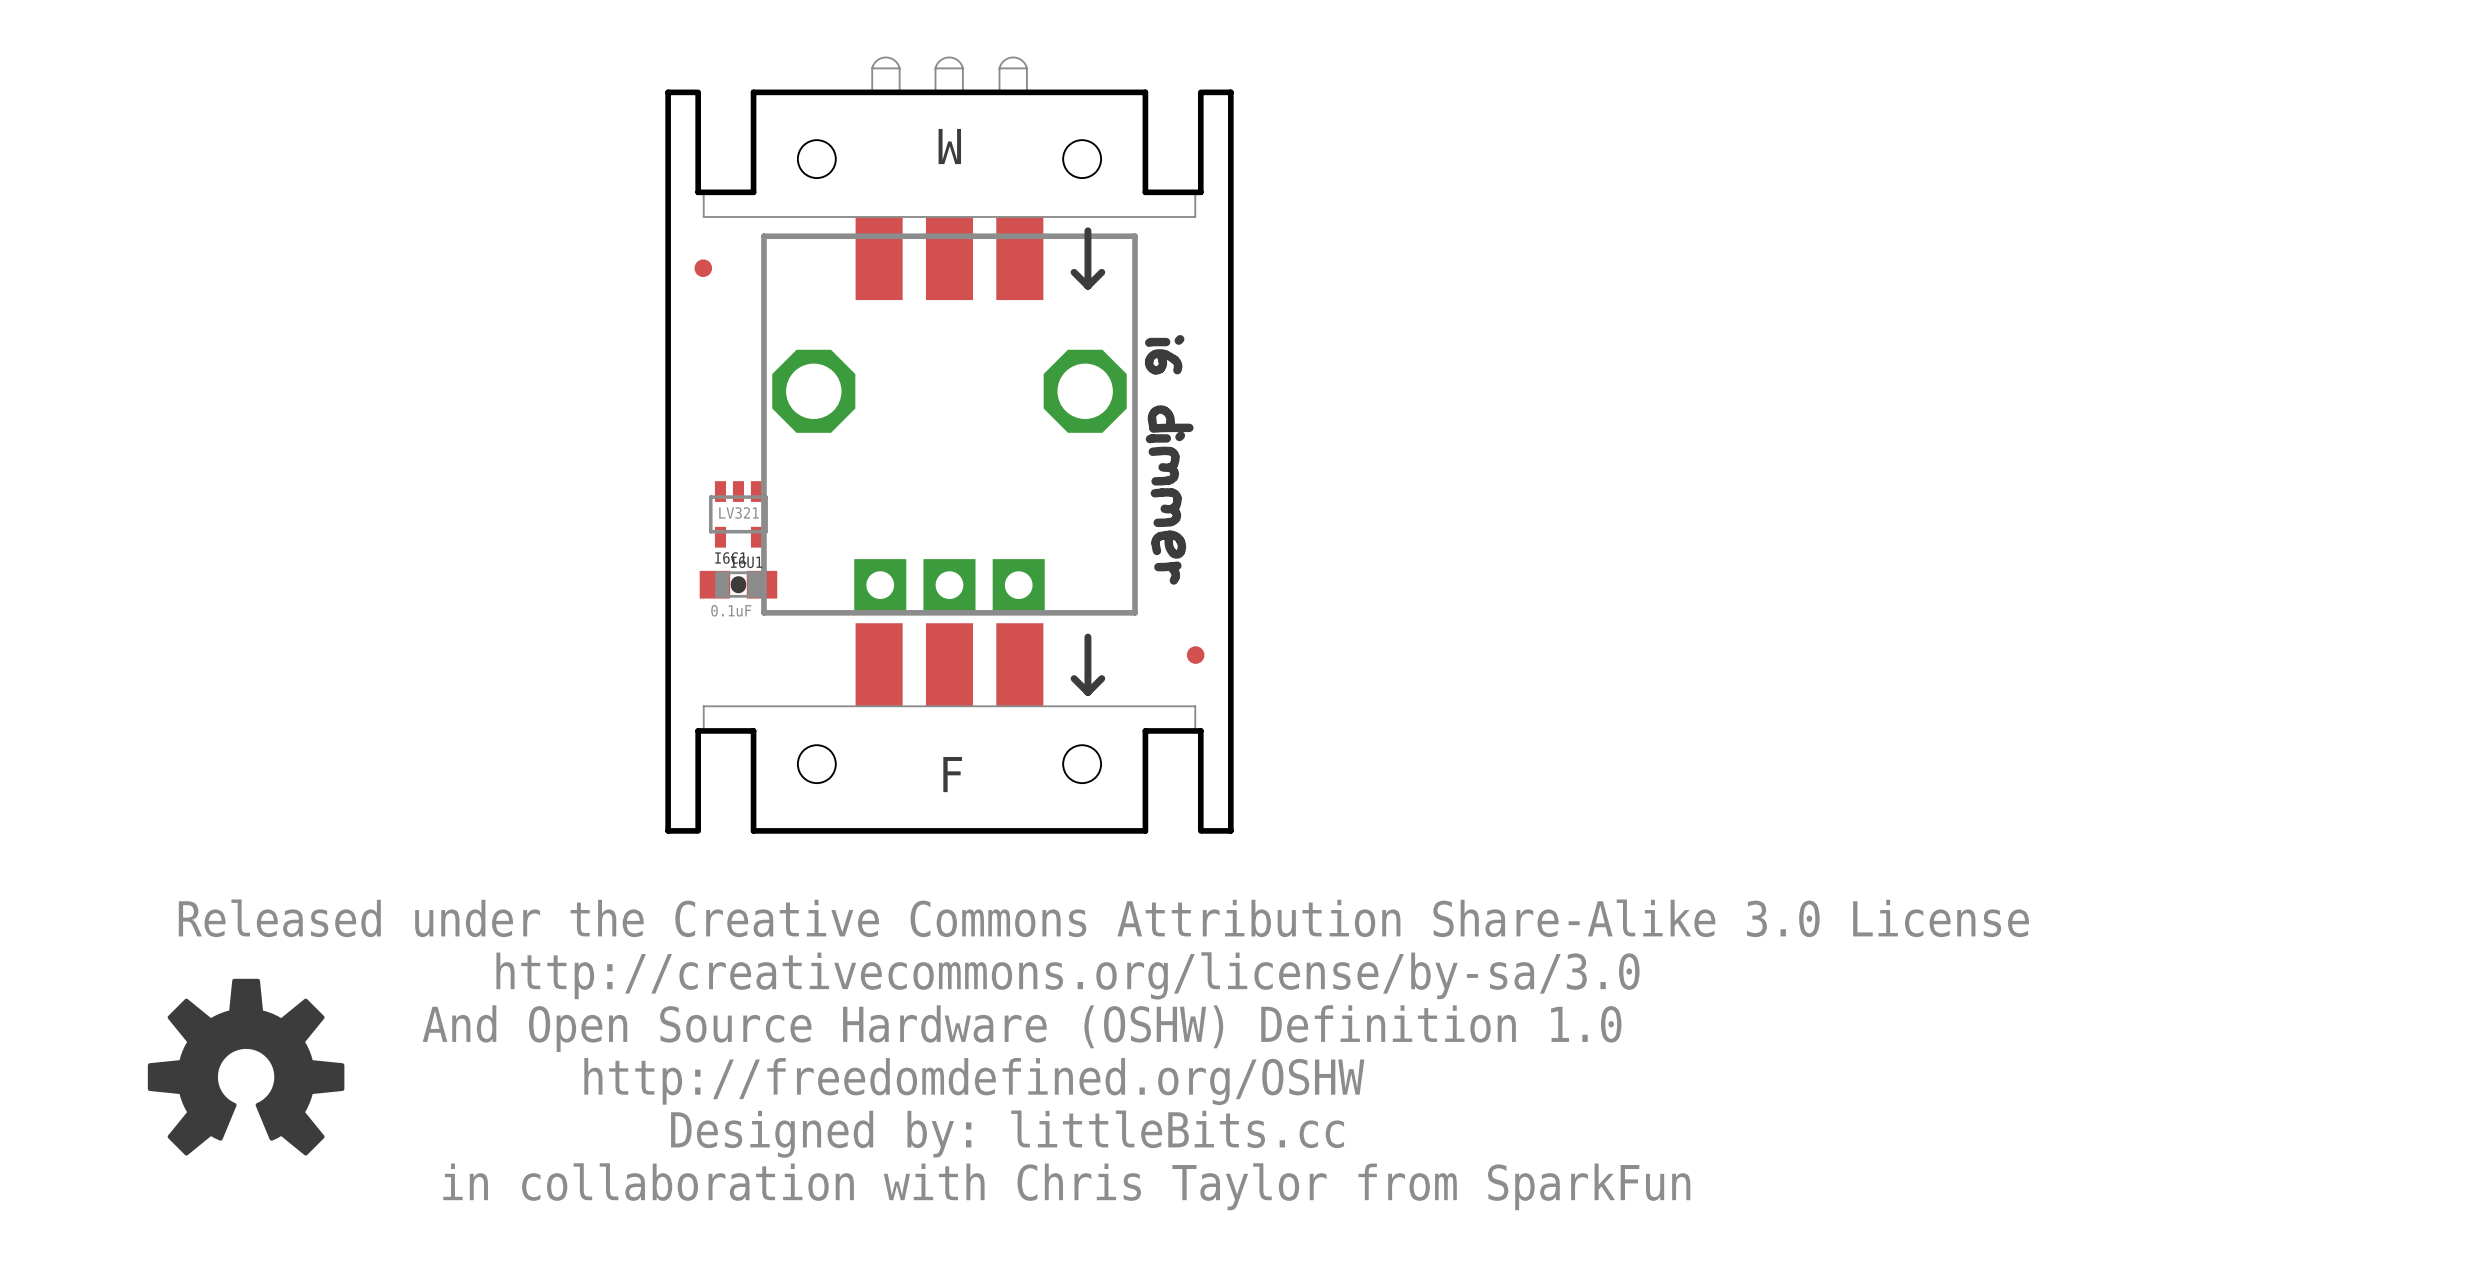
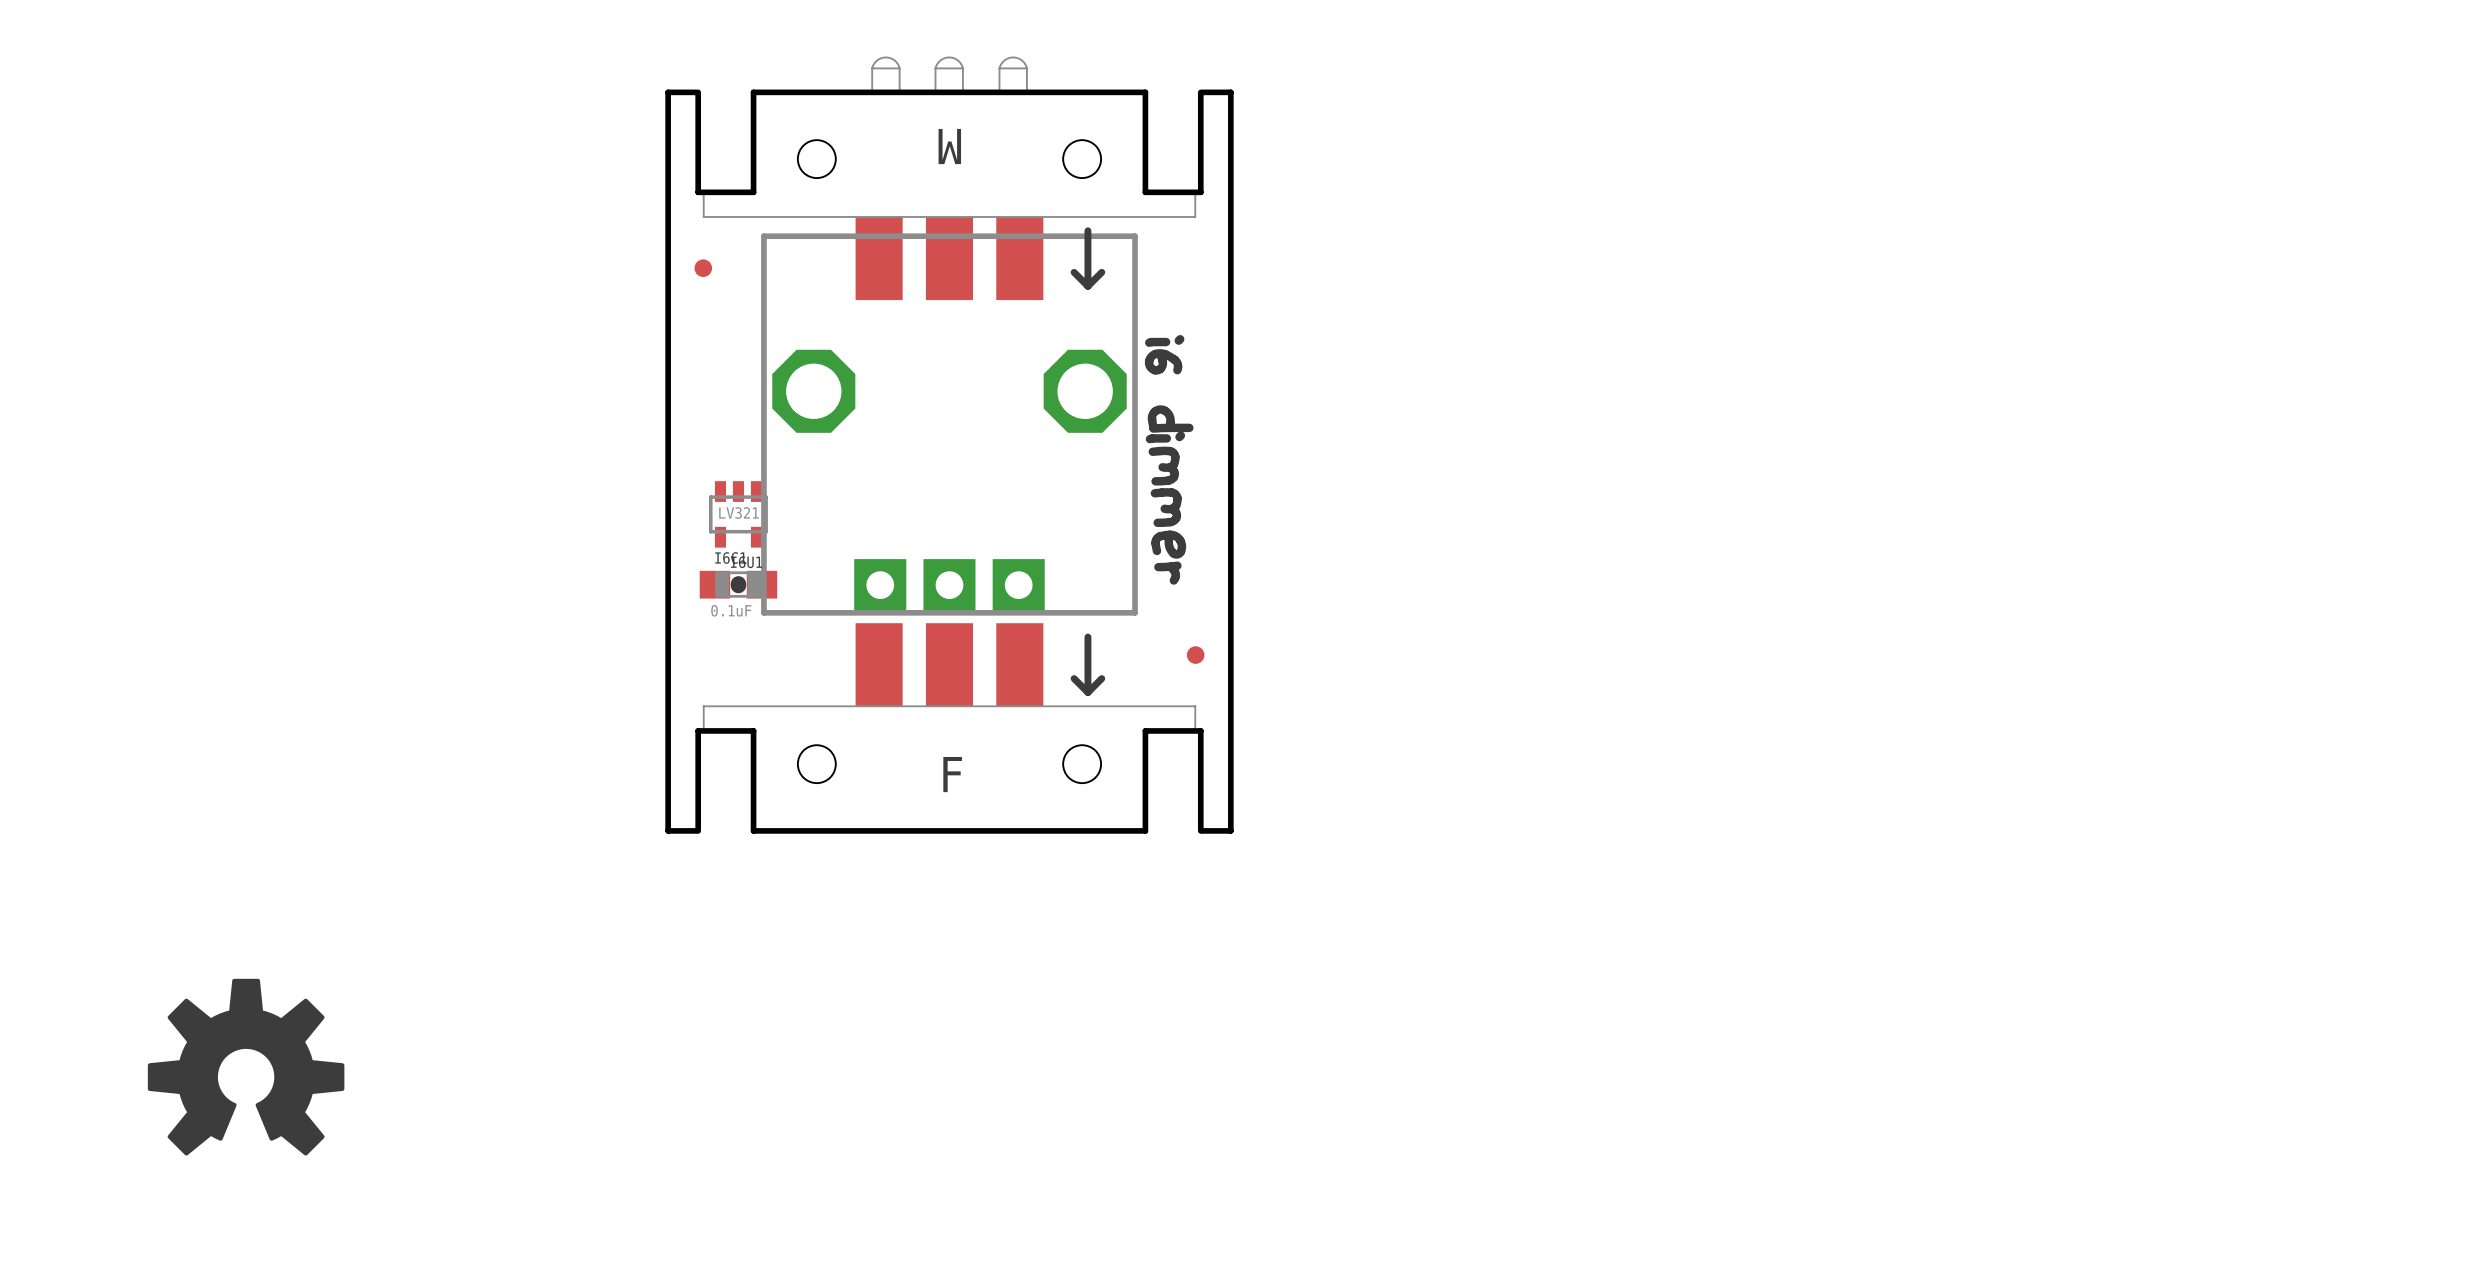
drawing: [178, 899, 2029, 1211] -> none

